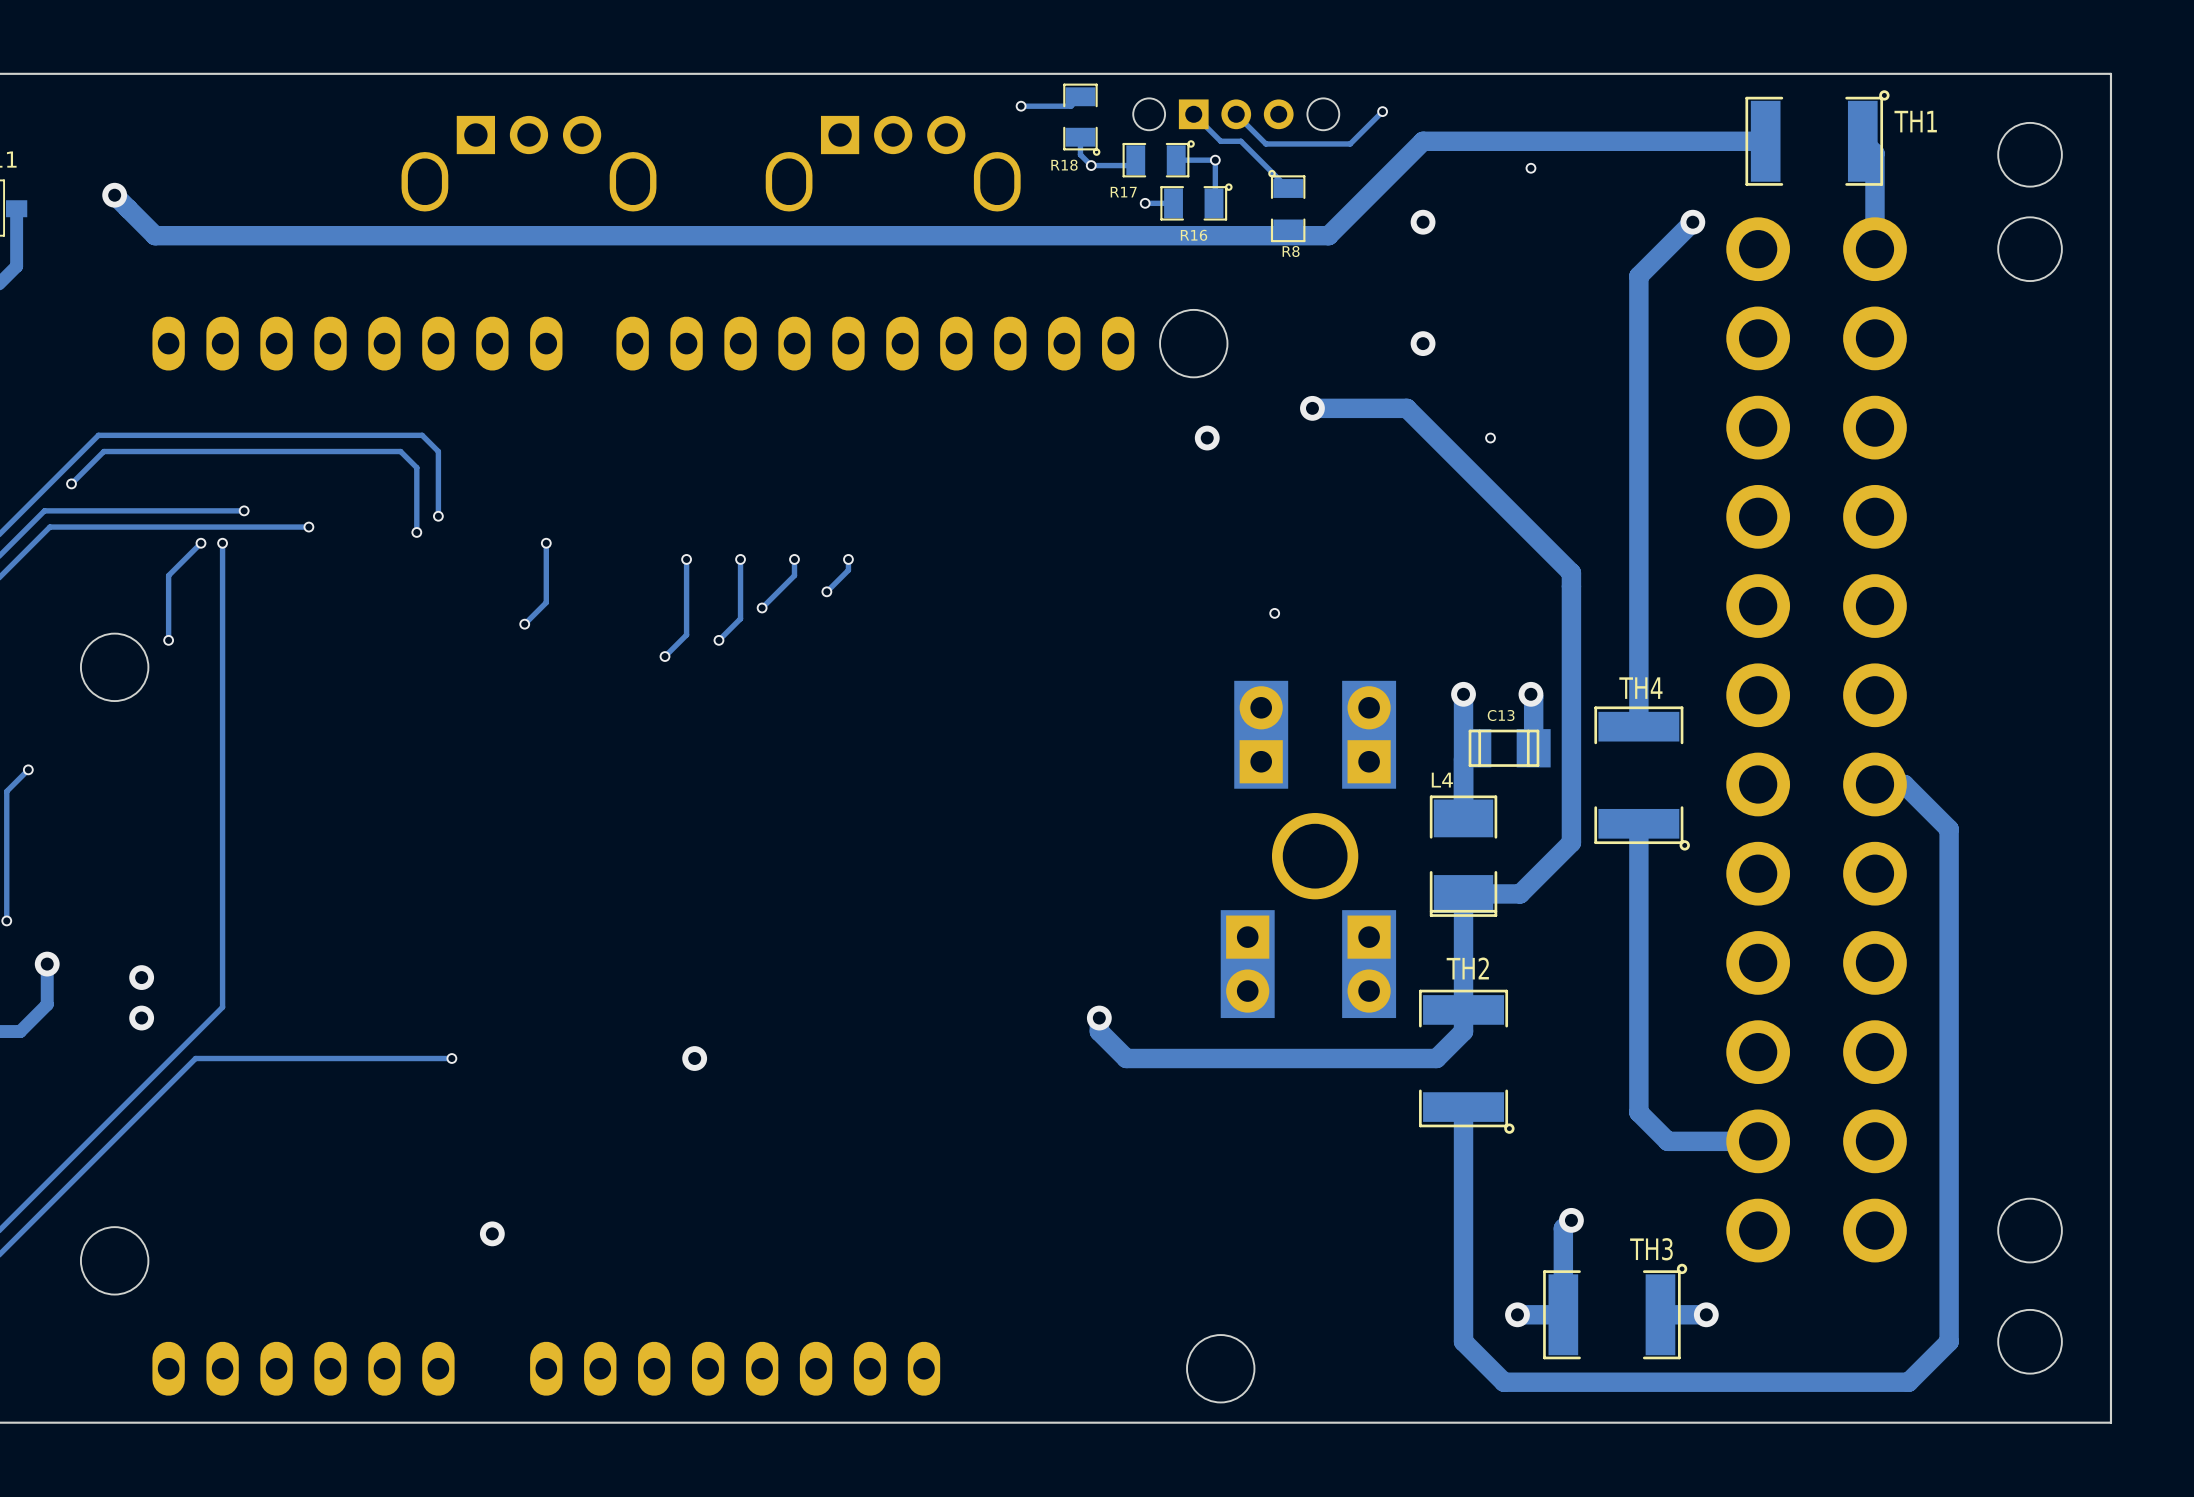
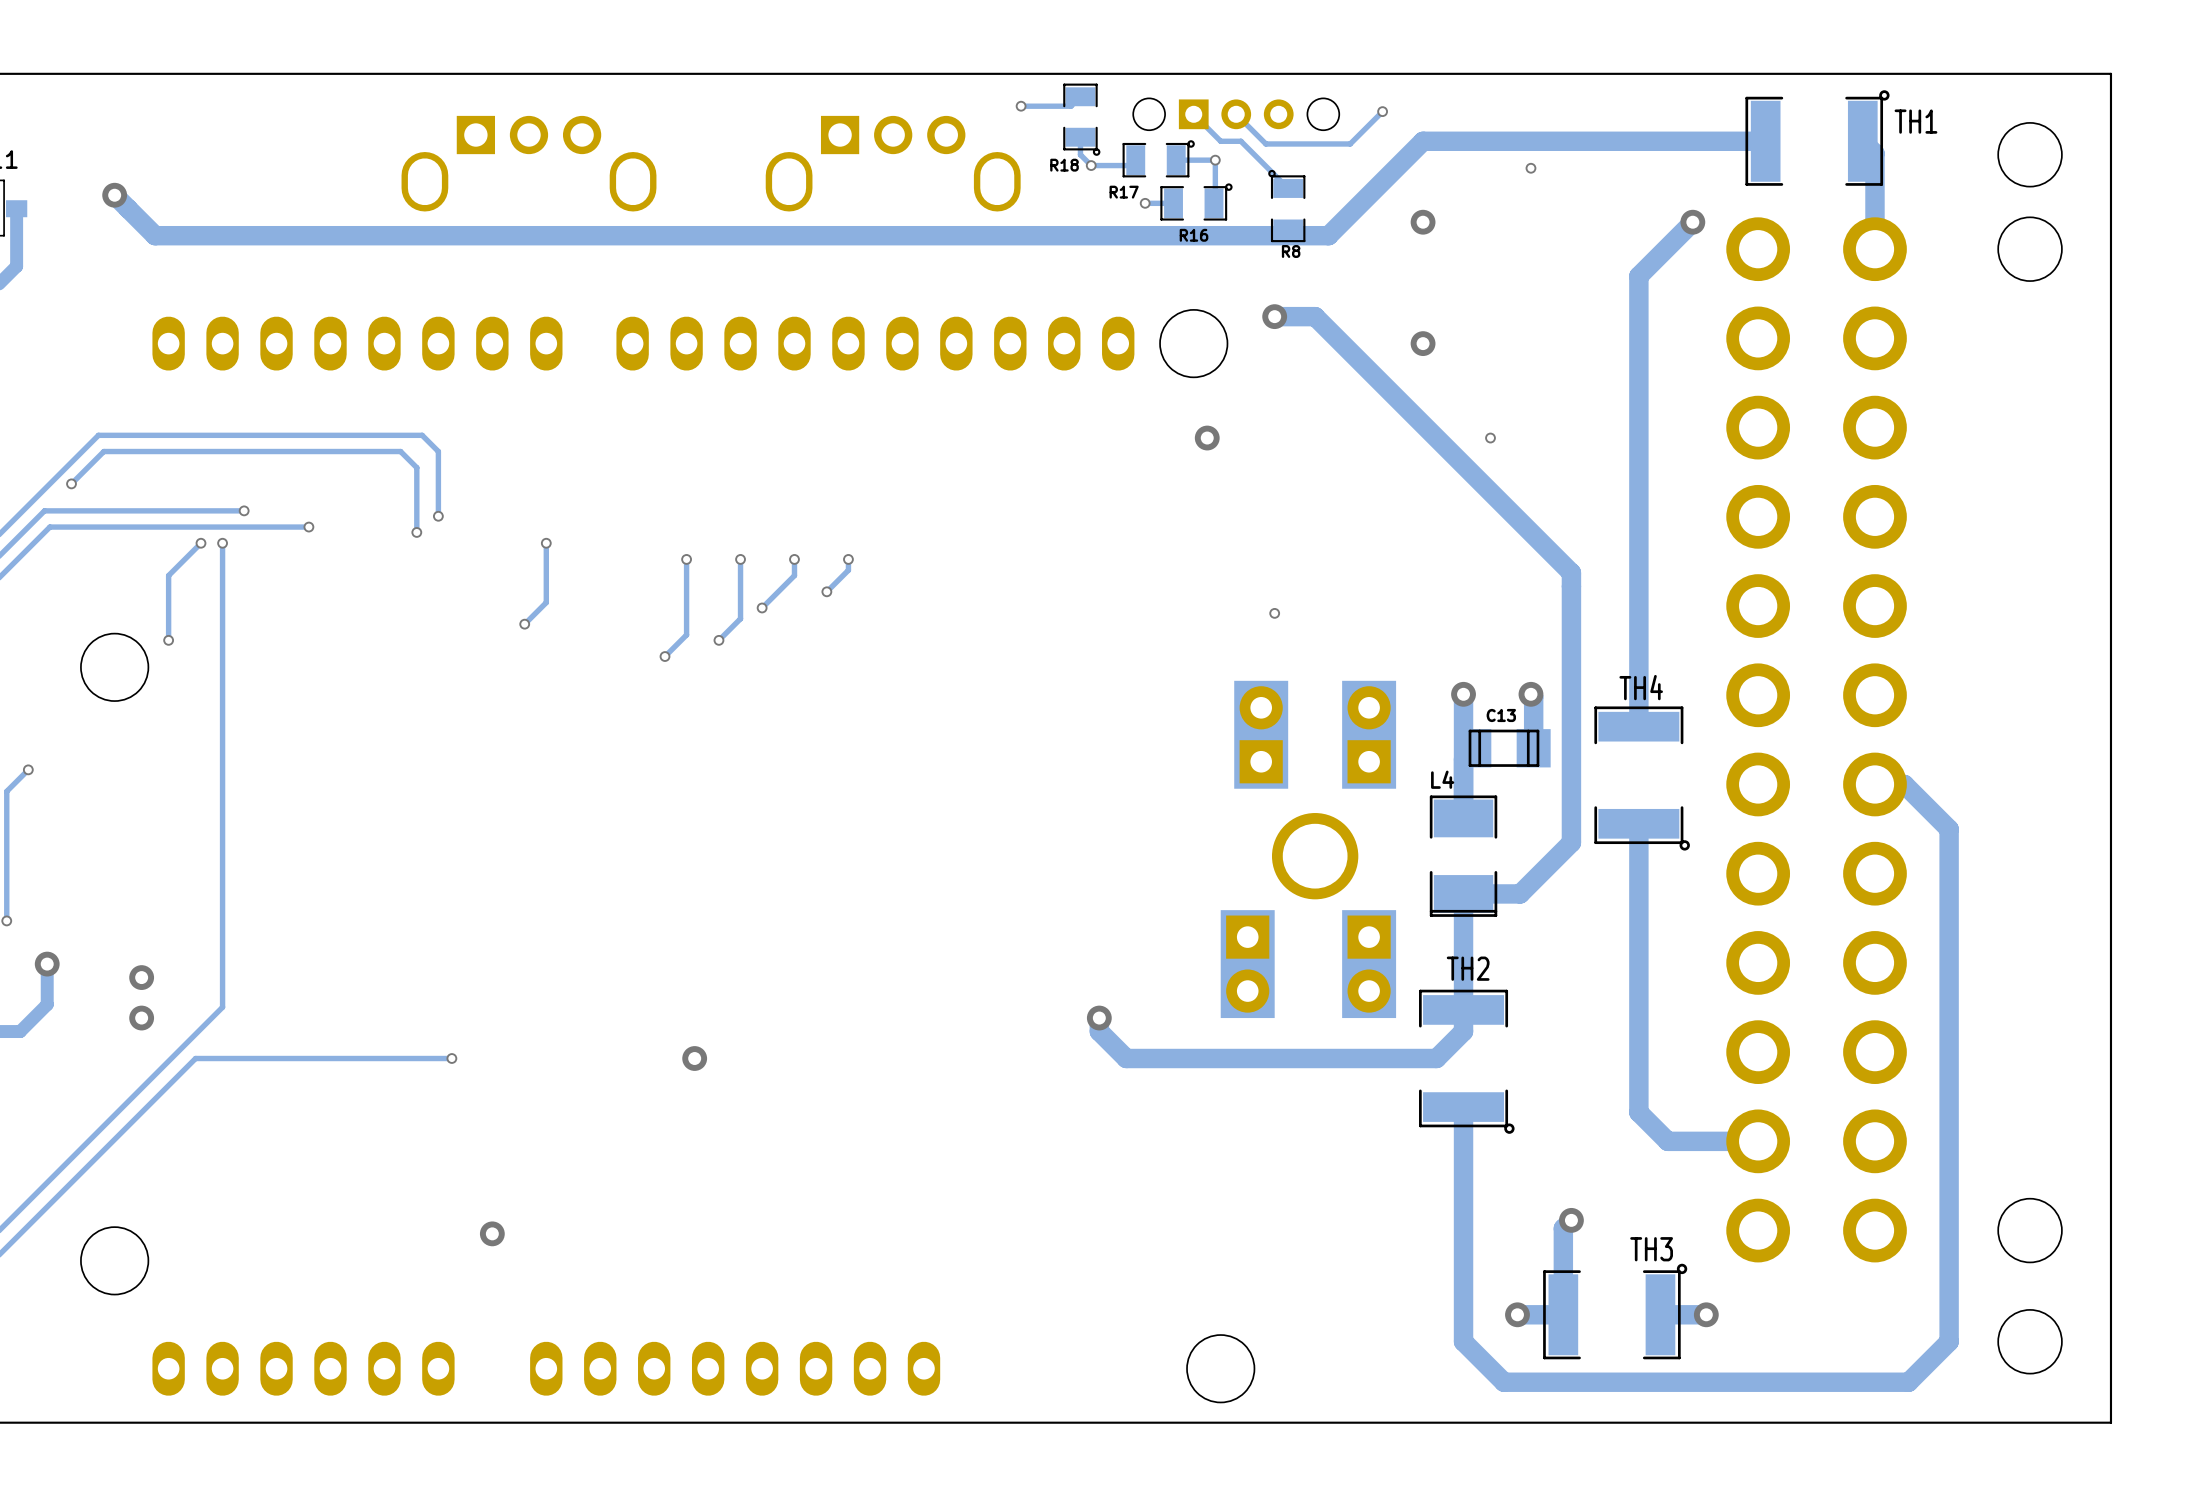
via position: (1312, 408) -> (1274, 316)
track: (1406, 408) (1312, 408) -> (1406, 408) (1315, 316) (1274, 316)

